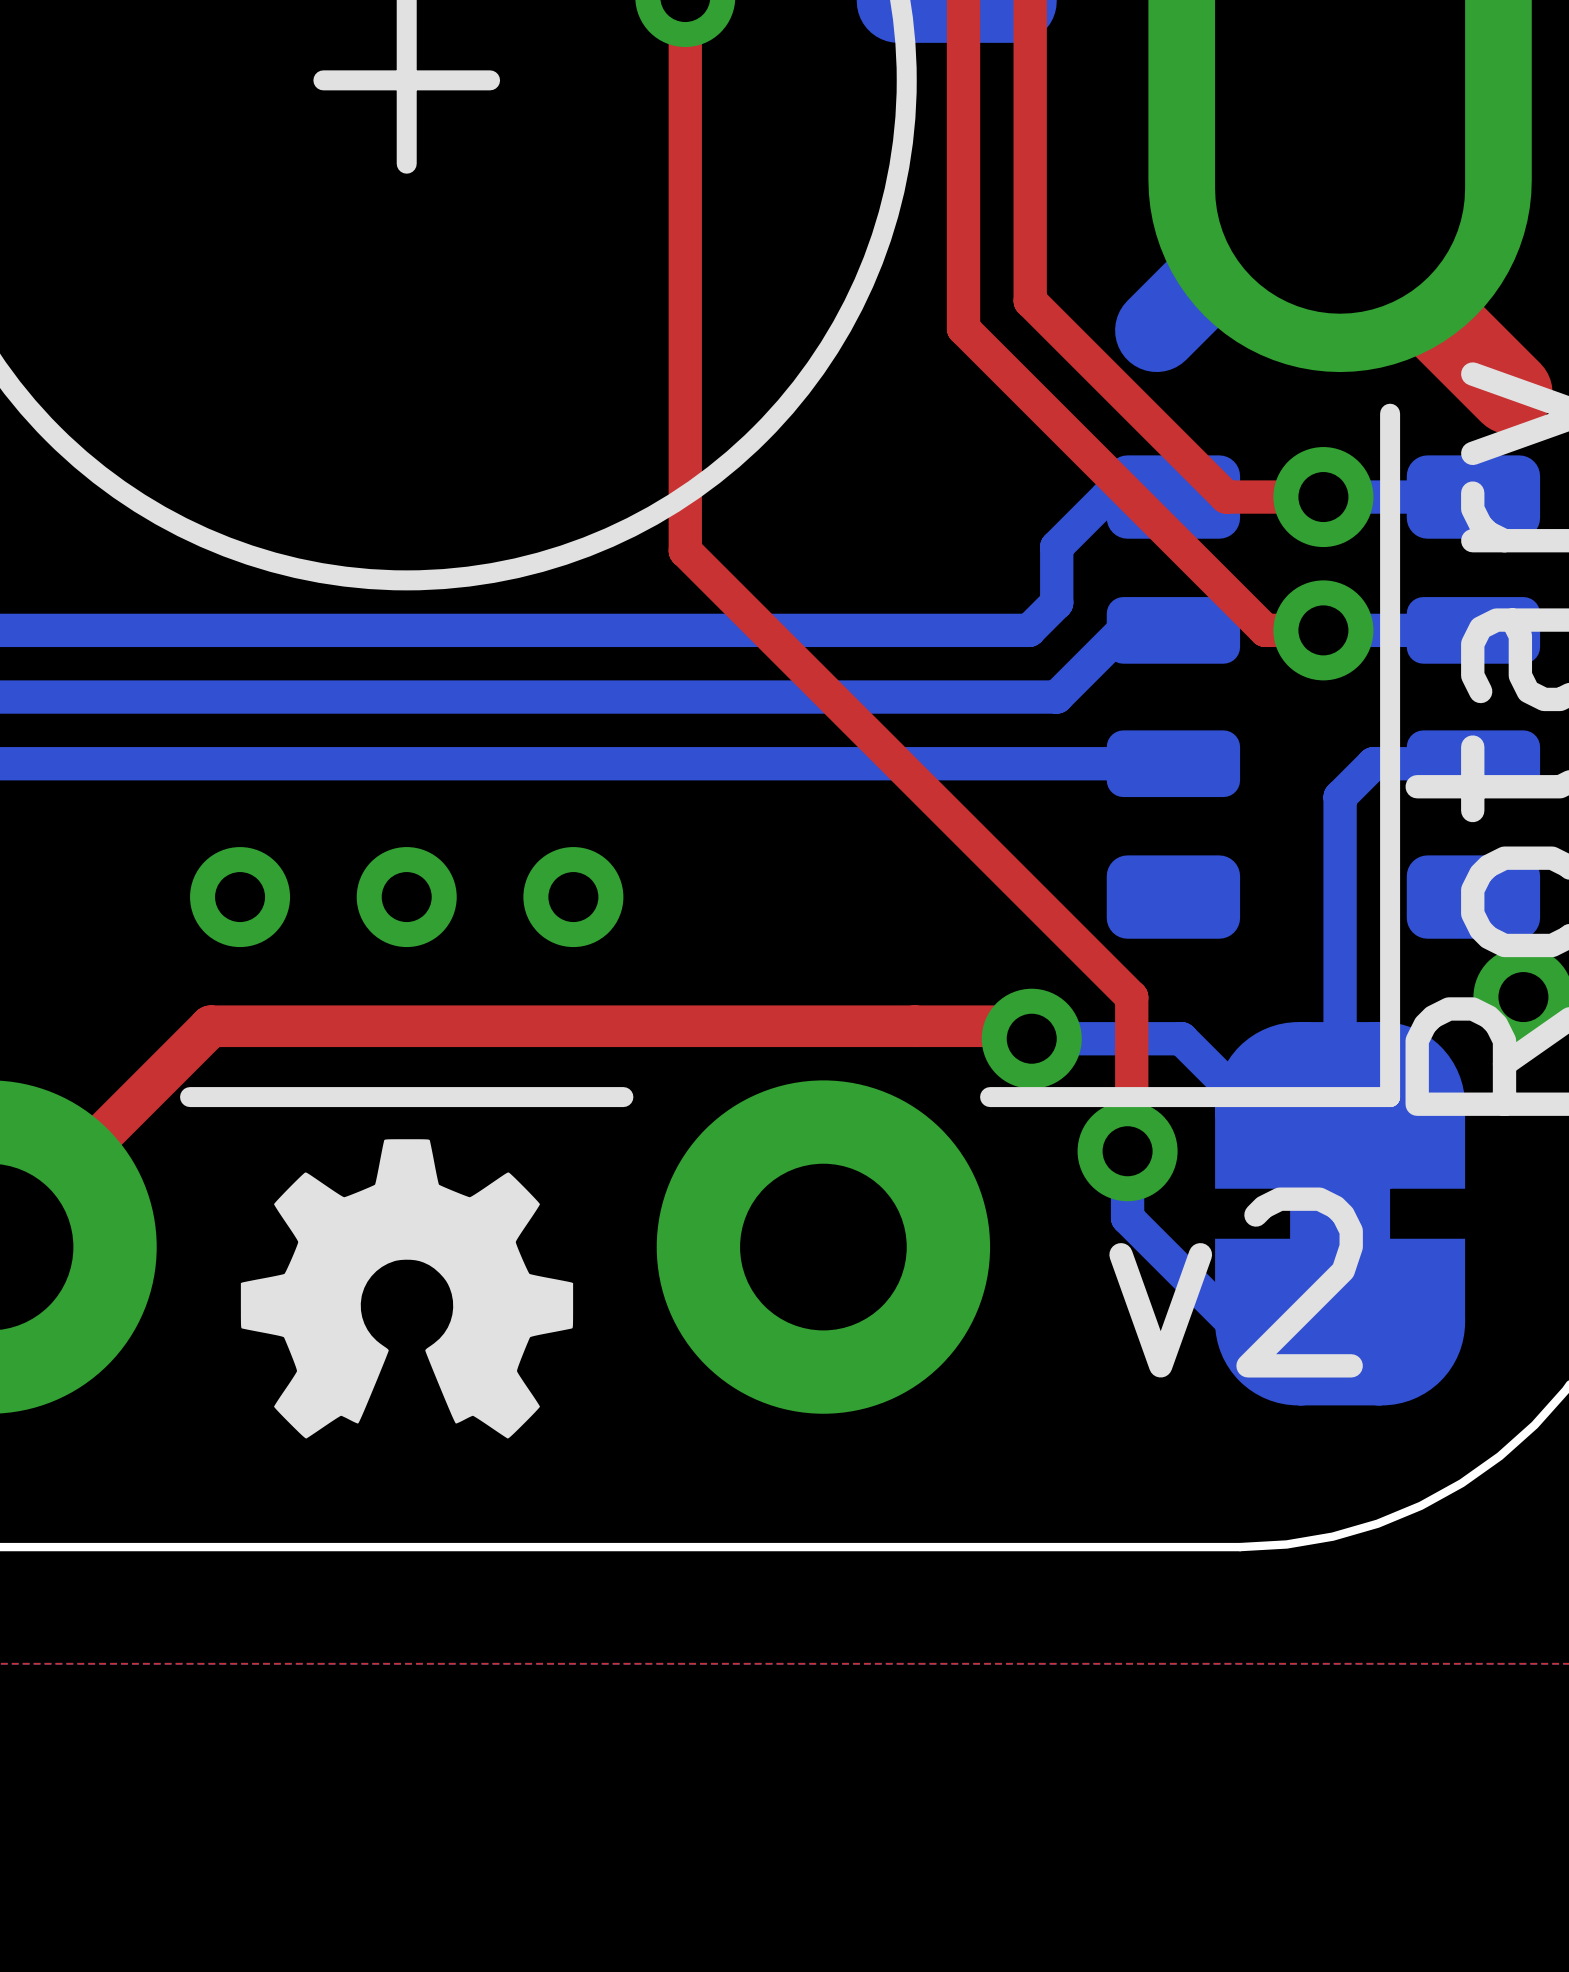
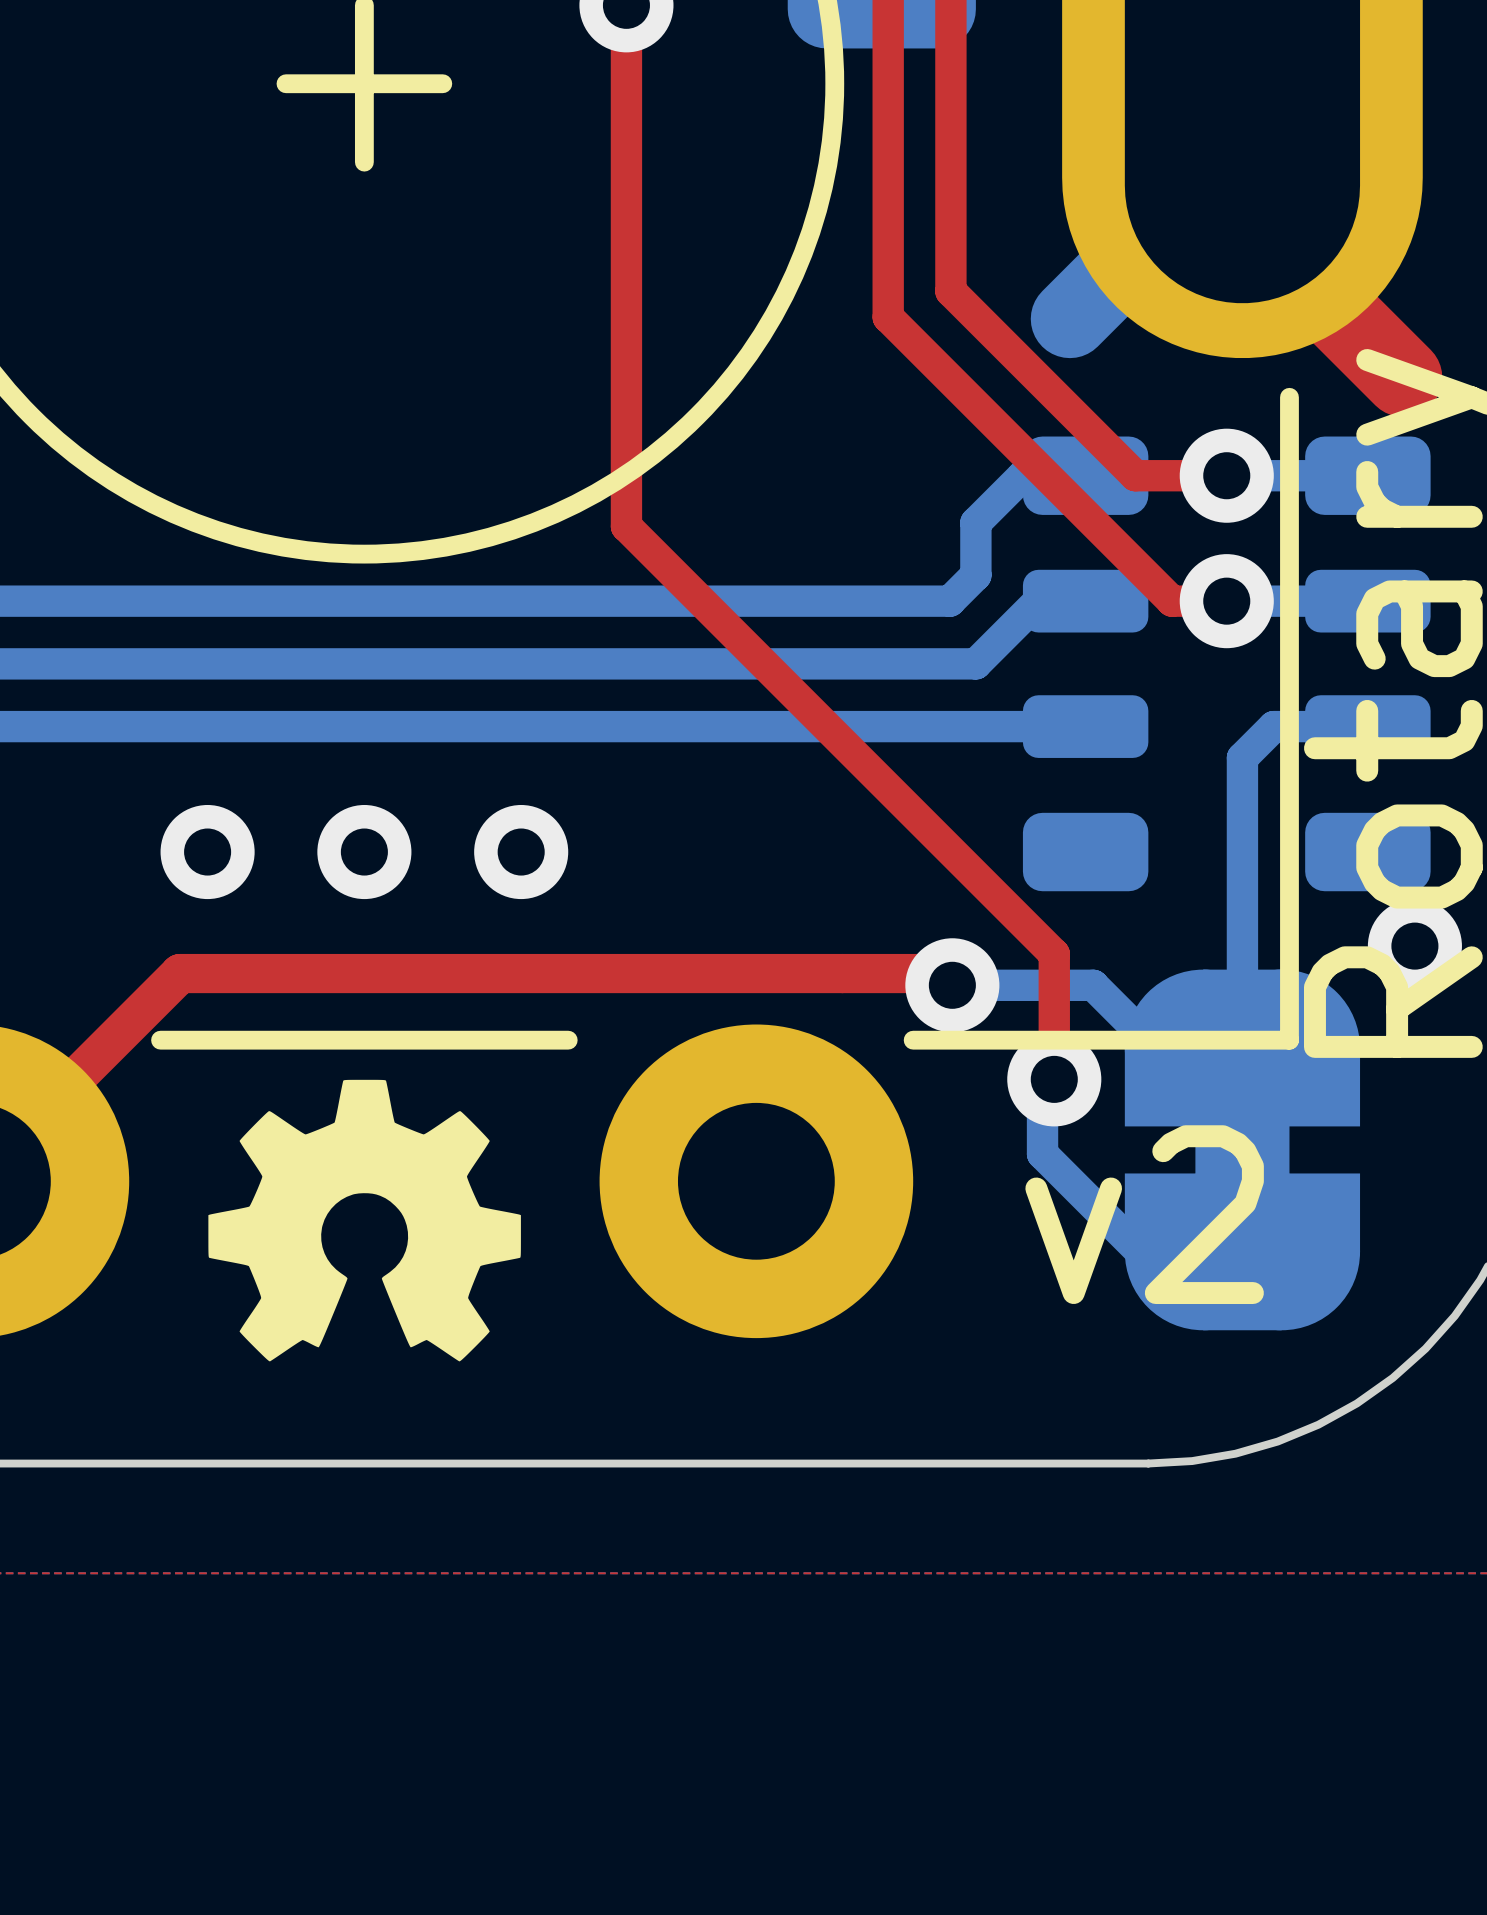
top track: (1131, 997) (1131, 1147) (1127, 1151) -> (1046, 946) (1054, 954) (1054, 1079)
via position: (1127, 1151) -> (1054, 1079)

